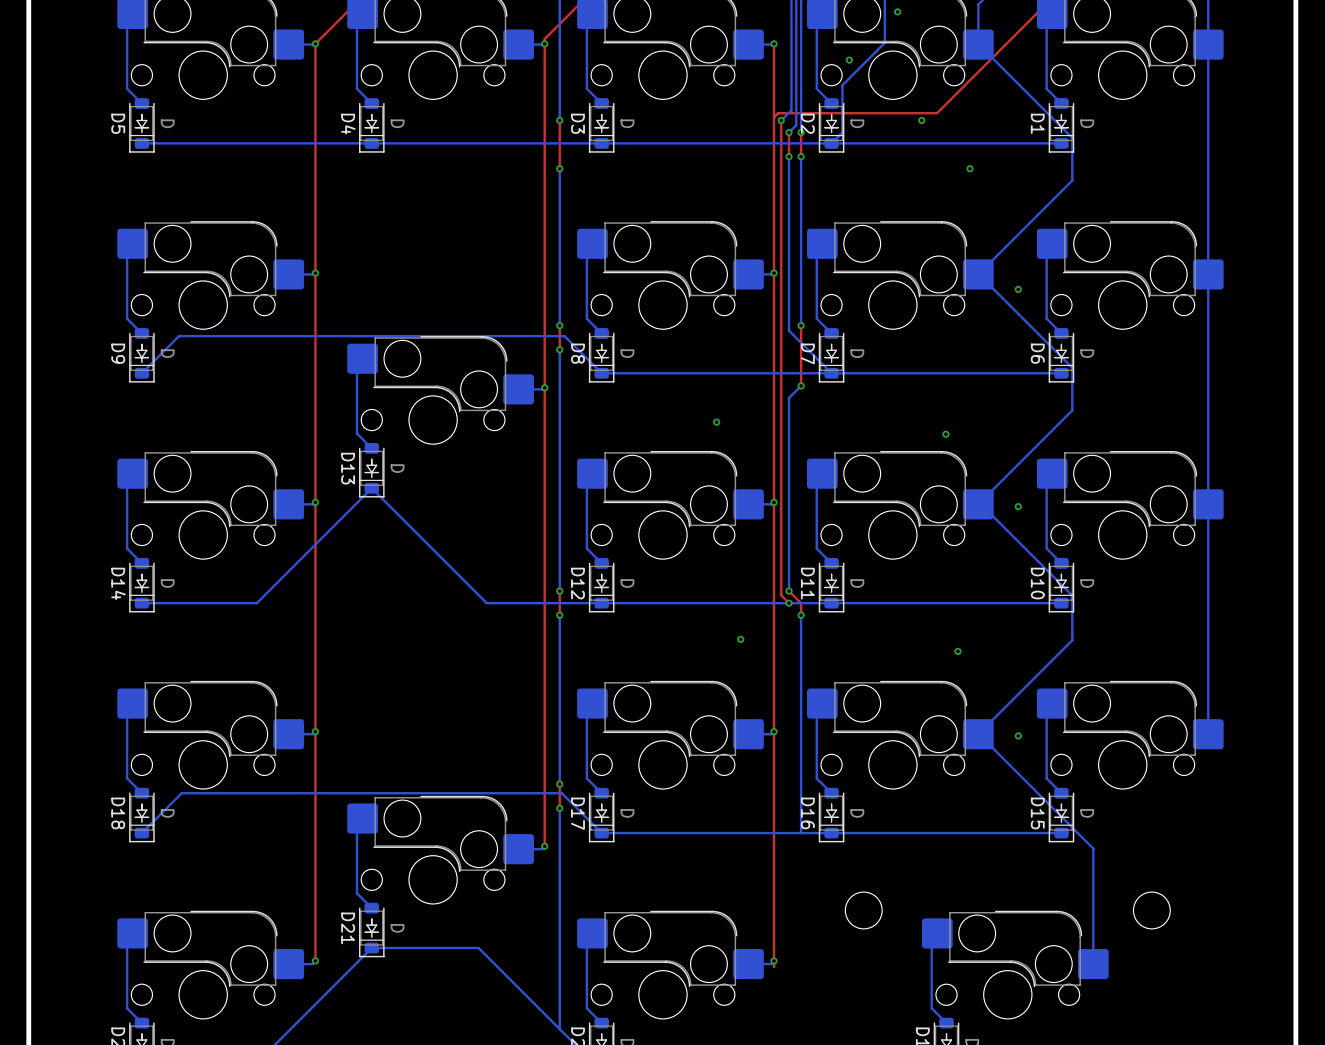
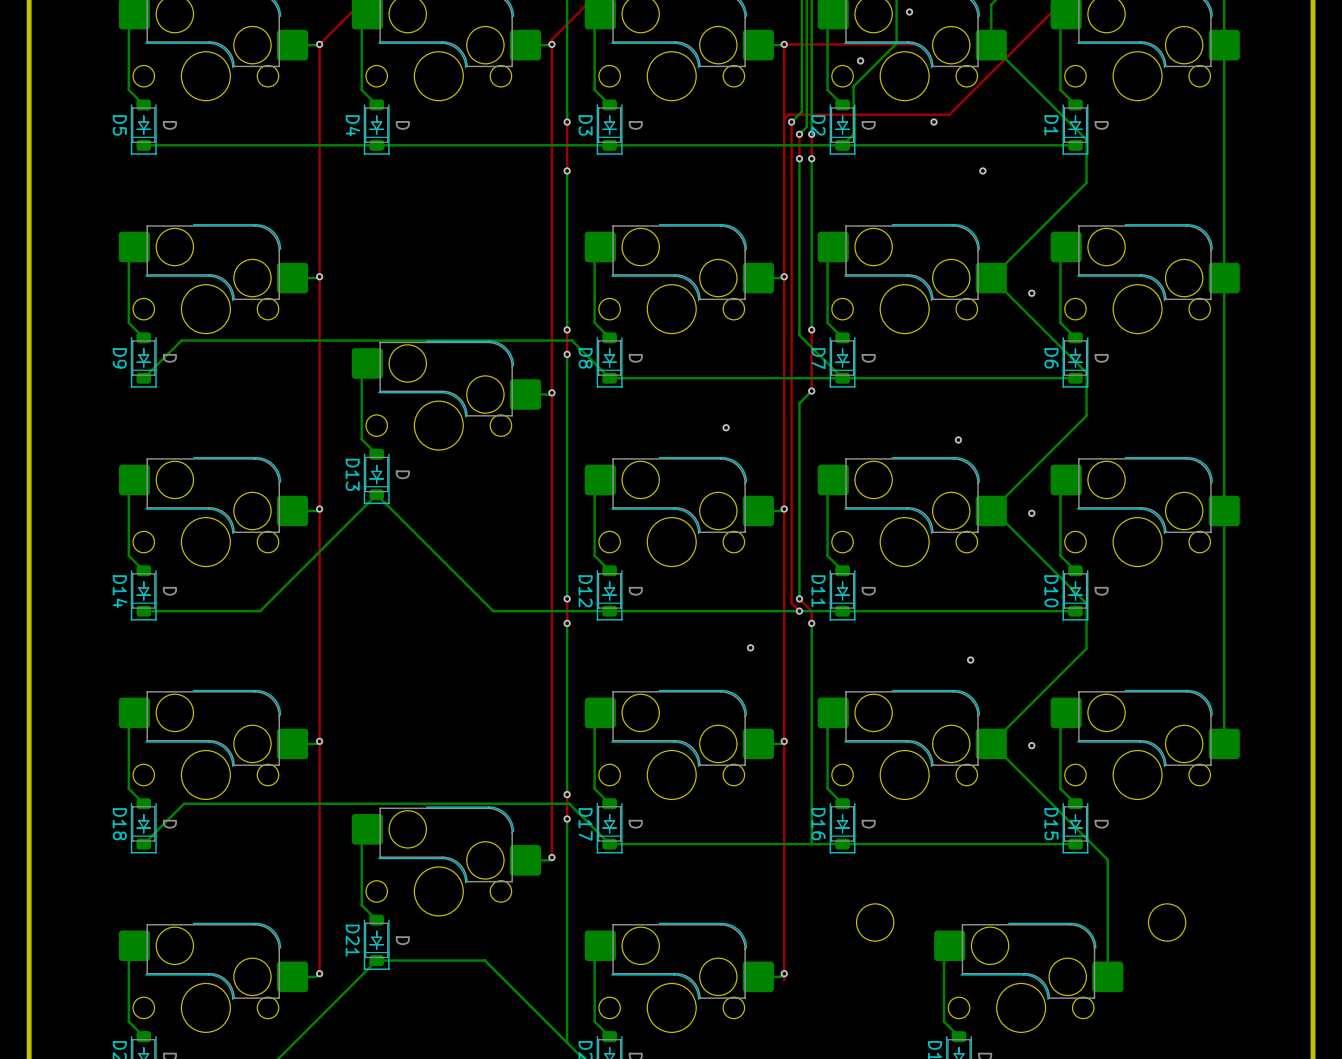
top track: none -> (913, 44) (784, 44)

